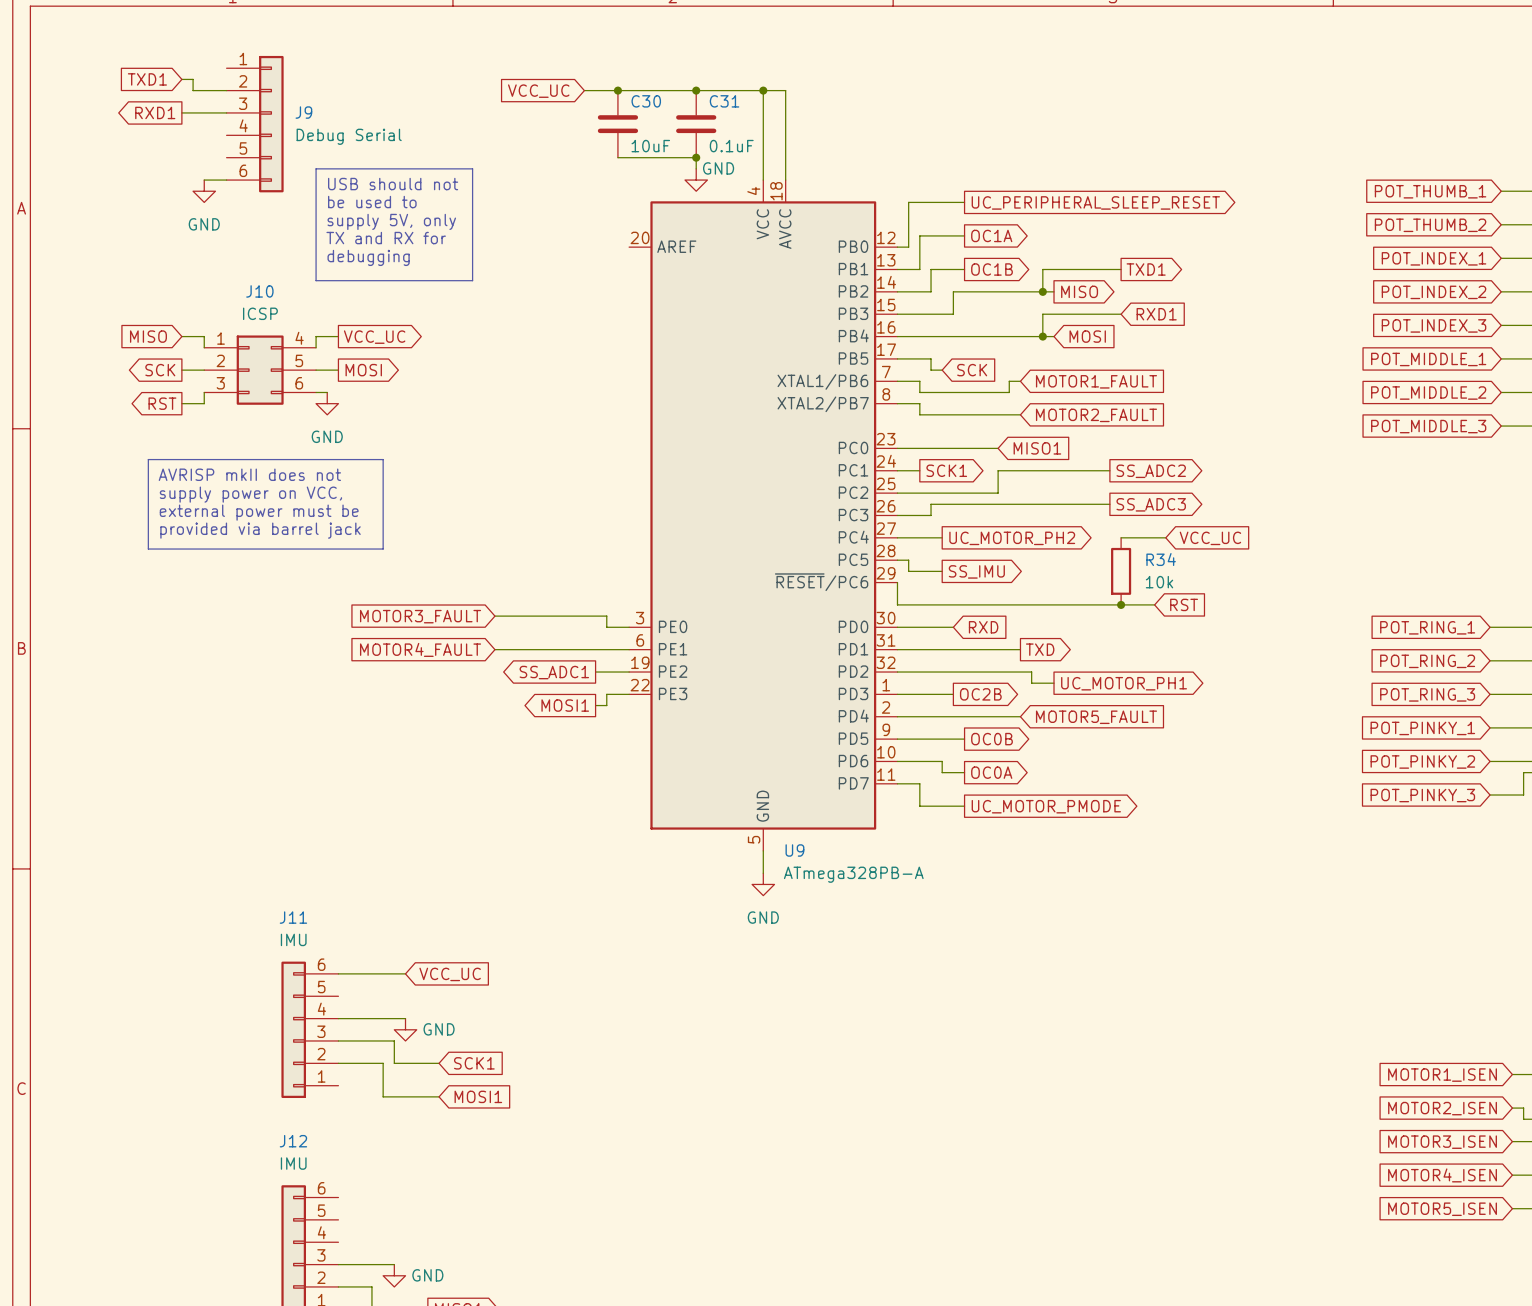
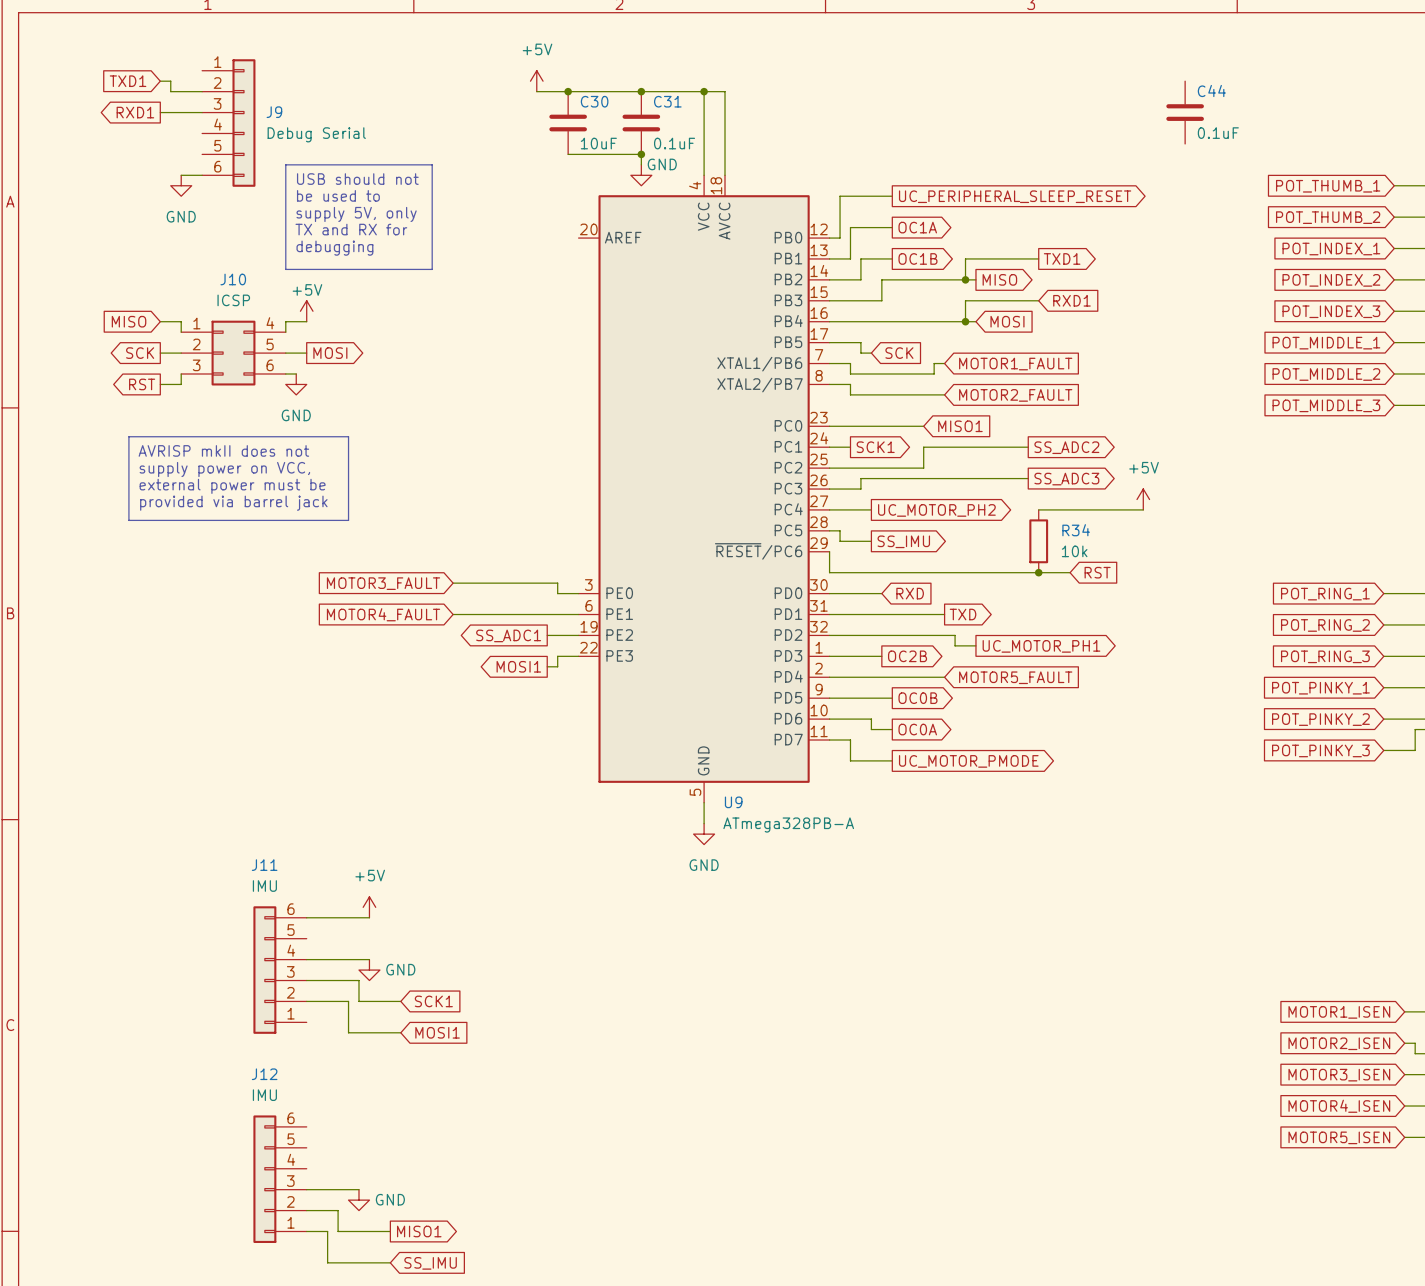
power symbol: none -> +5V (536, 81)
global label: VCC_UC (538, 91) -> none
C44: none -> 0.1uF (1185, 112)
power symbol: none -> +5V (306, 311)
global label: VCC_UC (374, 337) -> none
power symbol: none -> +5V (1143, 499)
wire: none -> (1080, 509) (1143, 509)
global label: VCC_UC (1210, 538) -> none
power symbol: none -> +5V (369, 907)
global label: VCC_UC (450, 974) -> none

